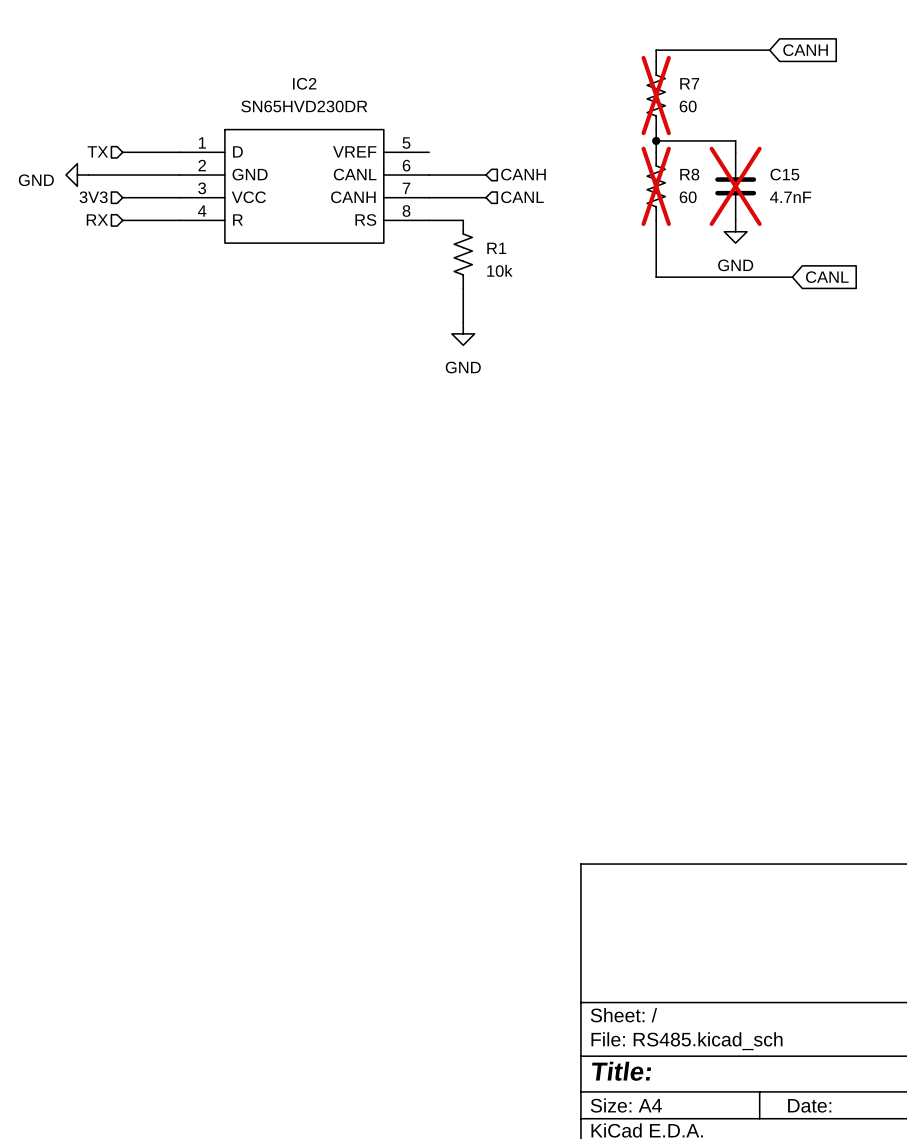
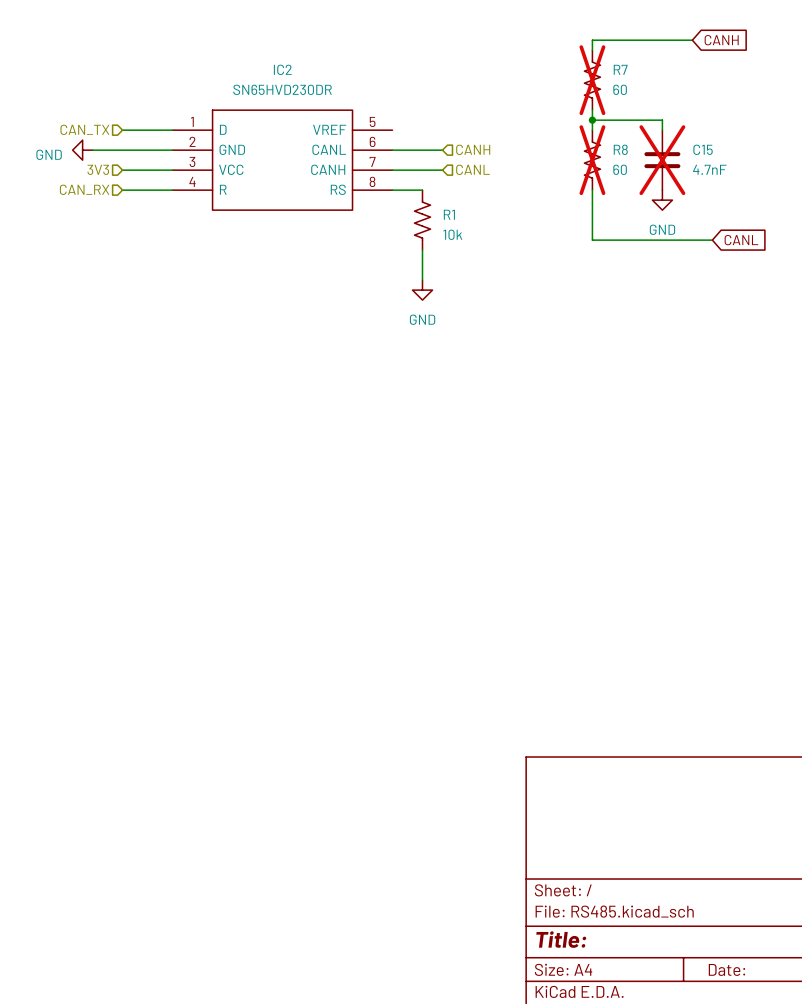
hierarchical label: TX (97, 151) -> CAN_TX (84, 129)
hierarchical label: RX (97, 219) -> CAN_RX (84, 189)

